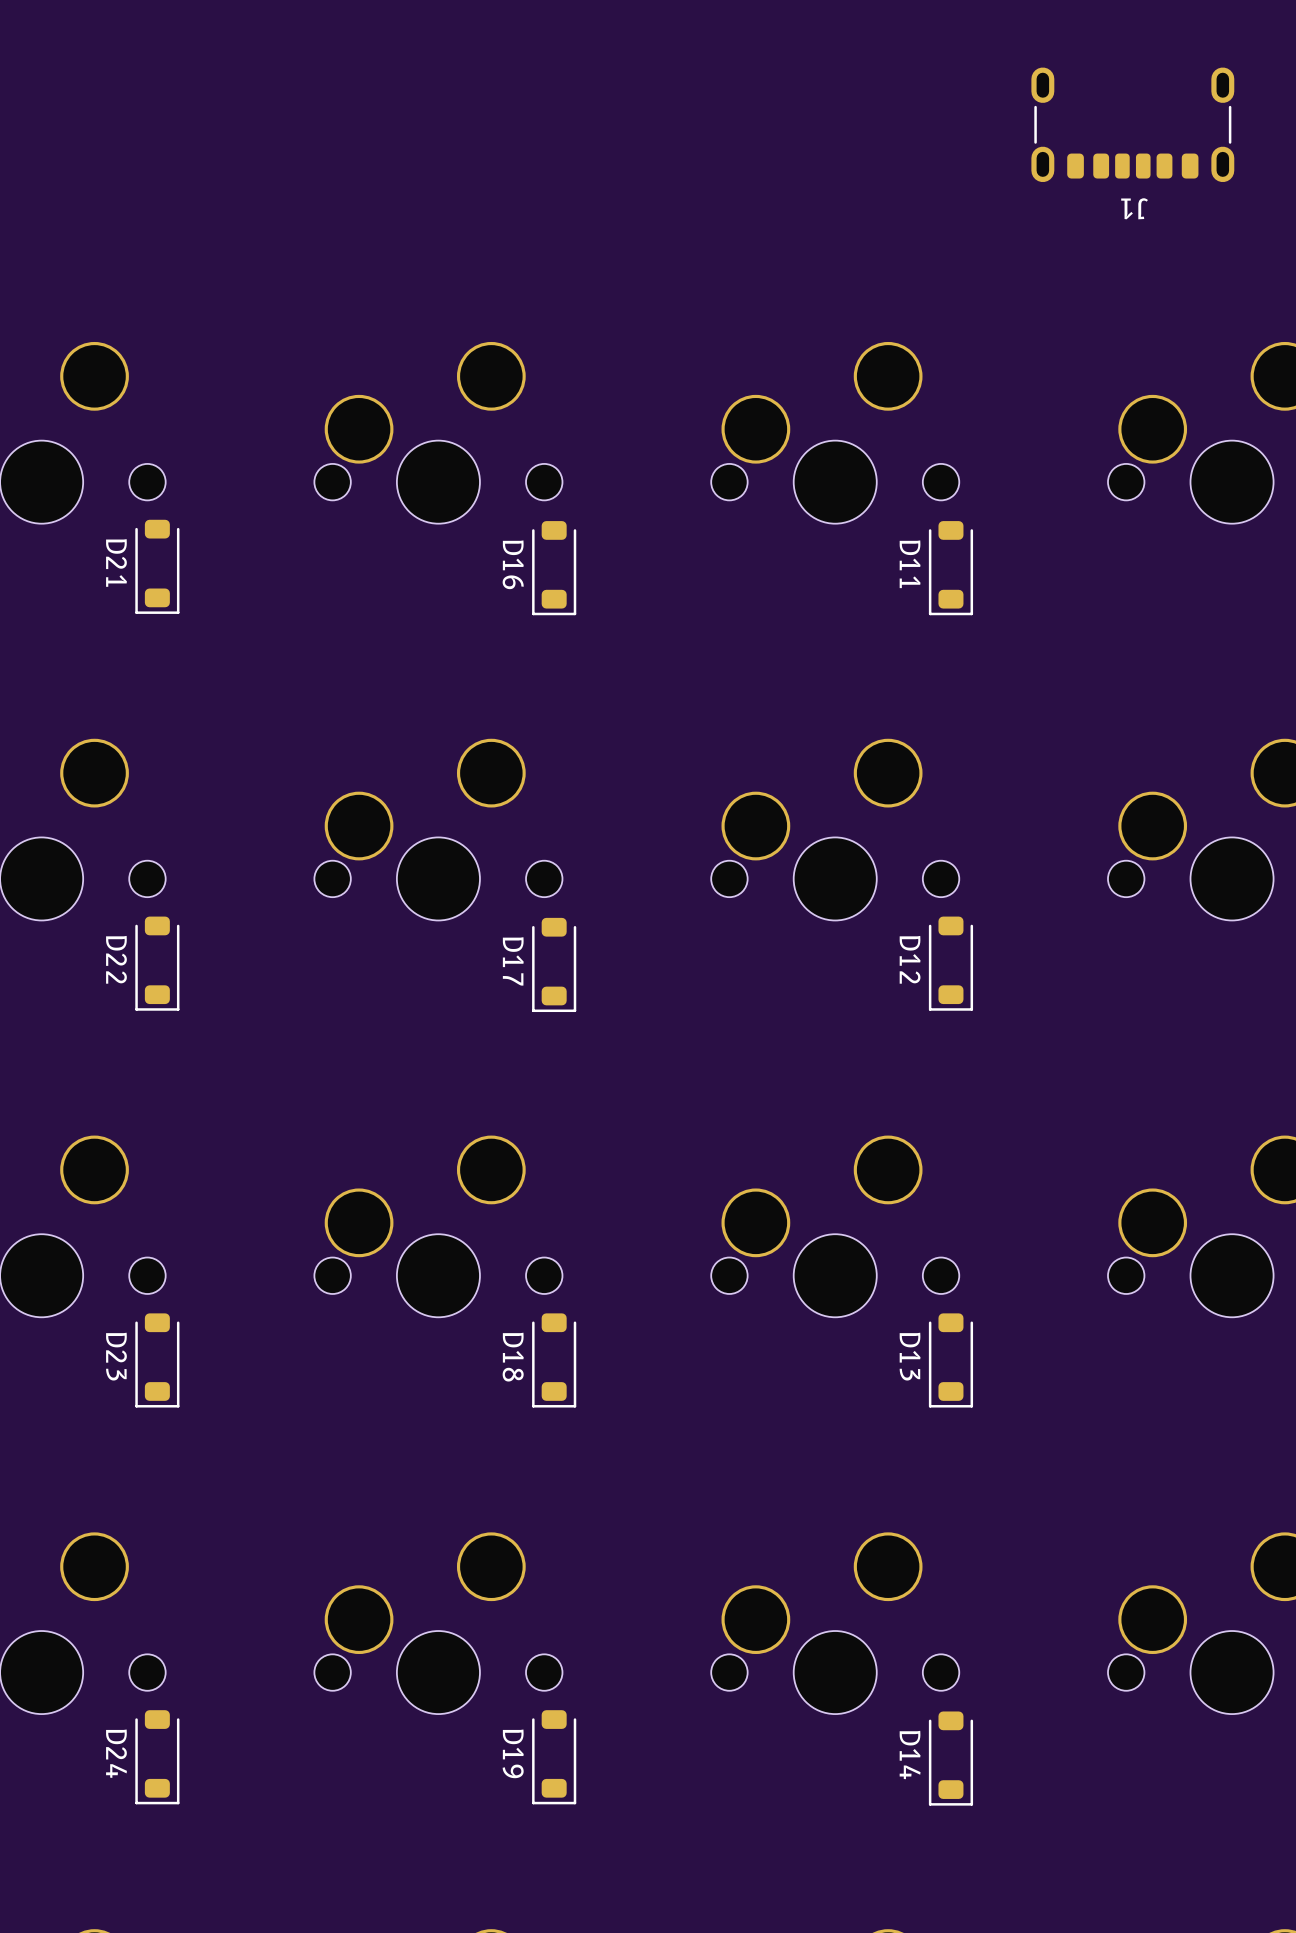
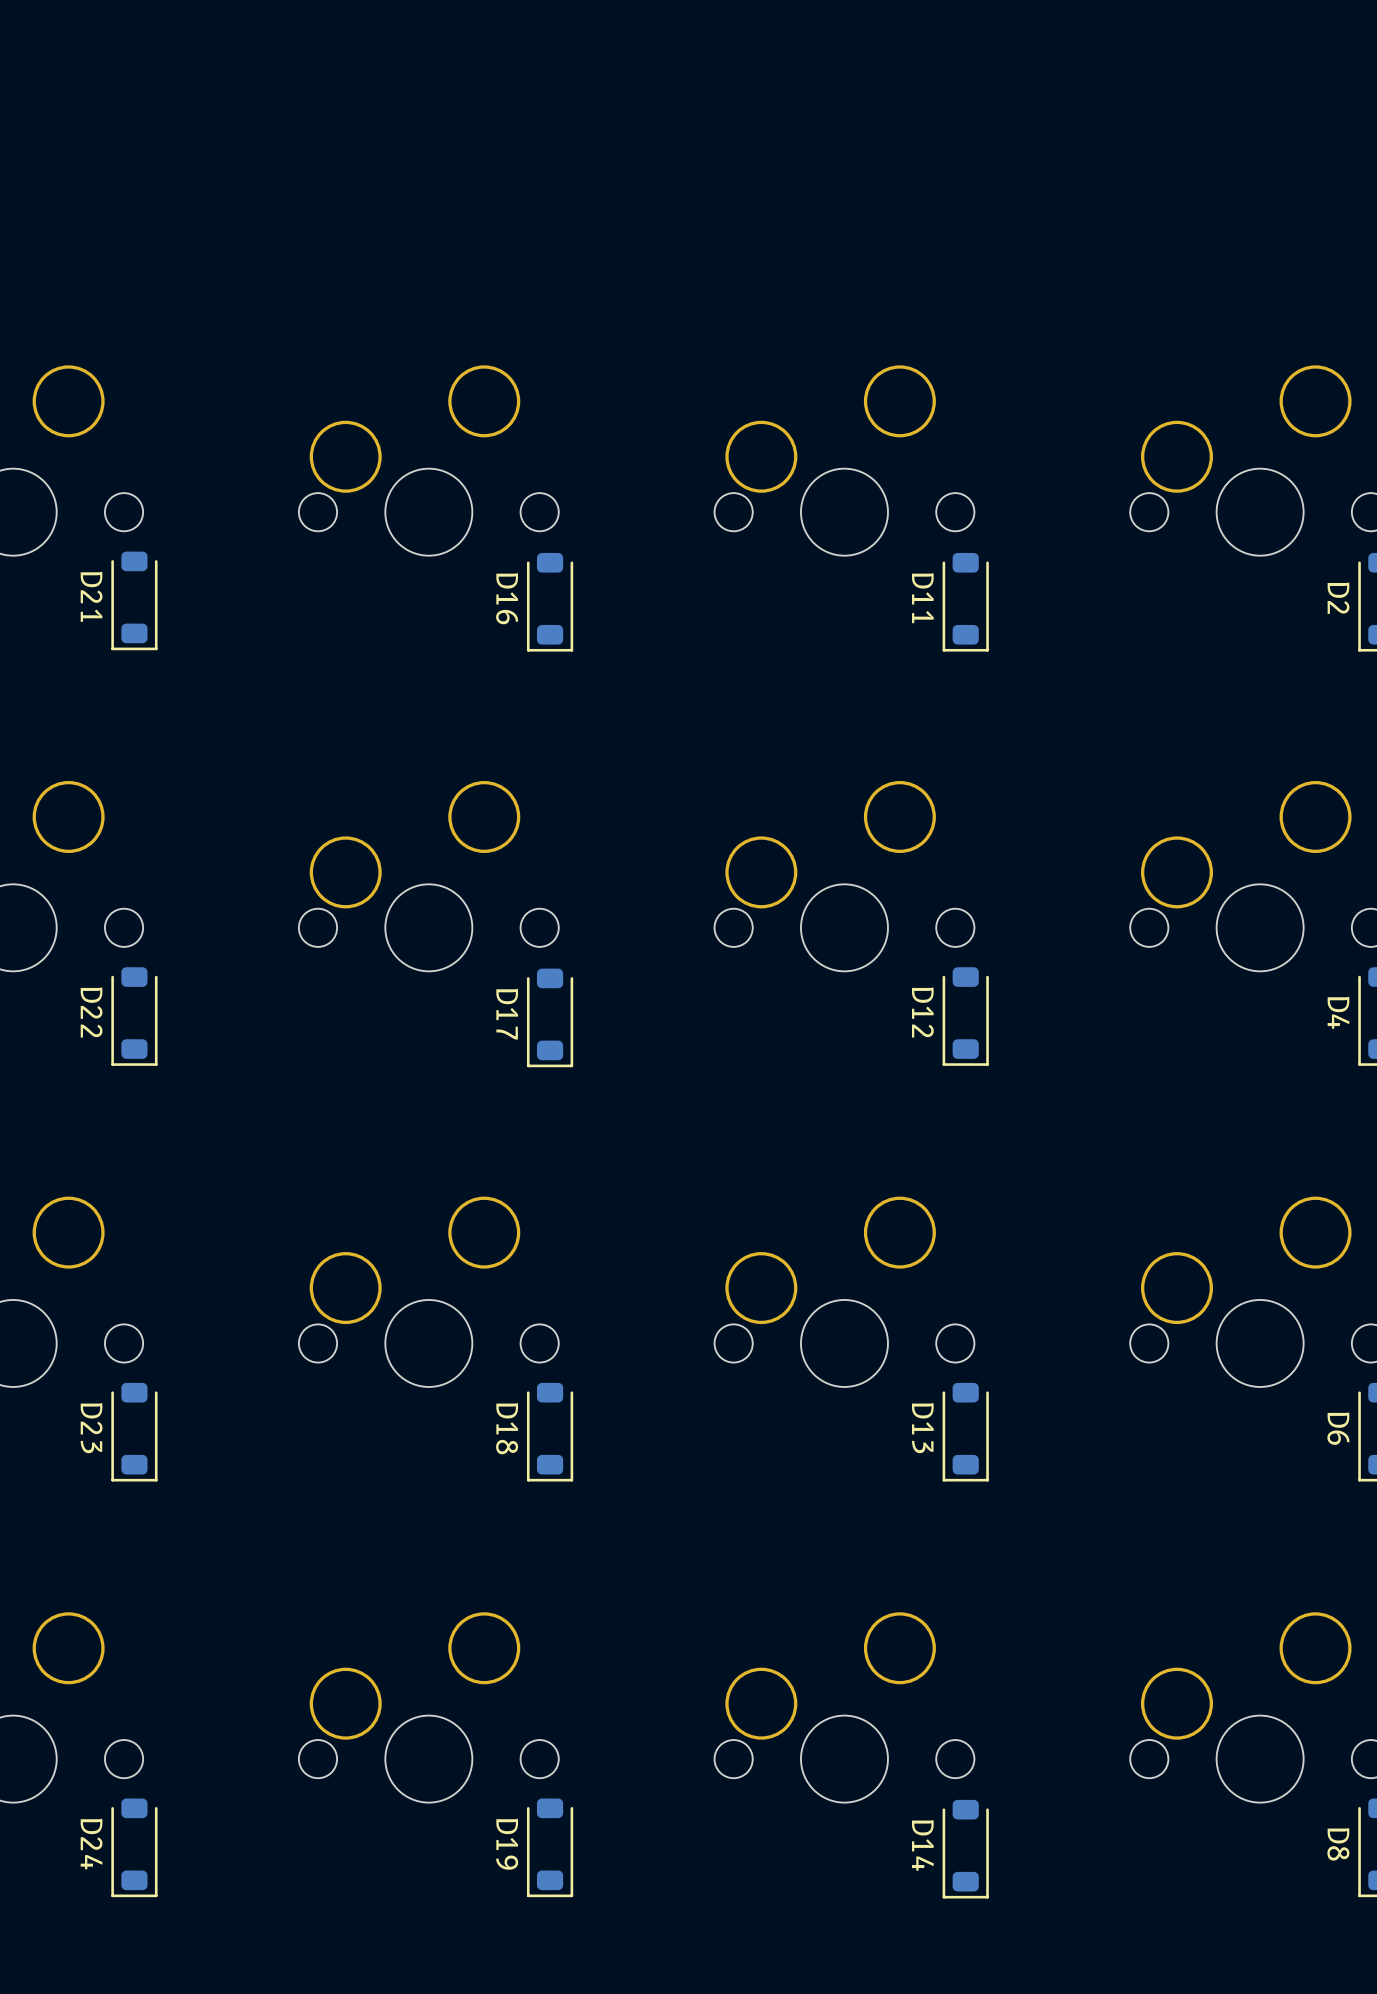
J1: (1132, 124) -> none

